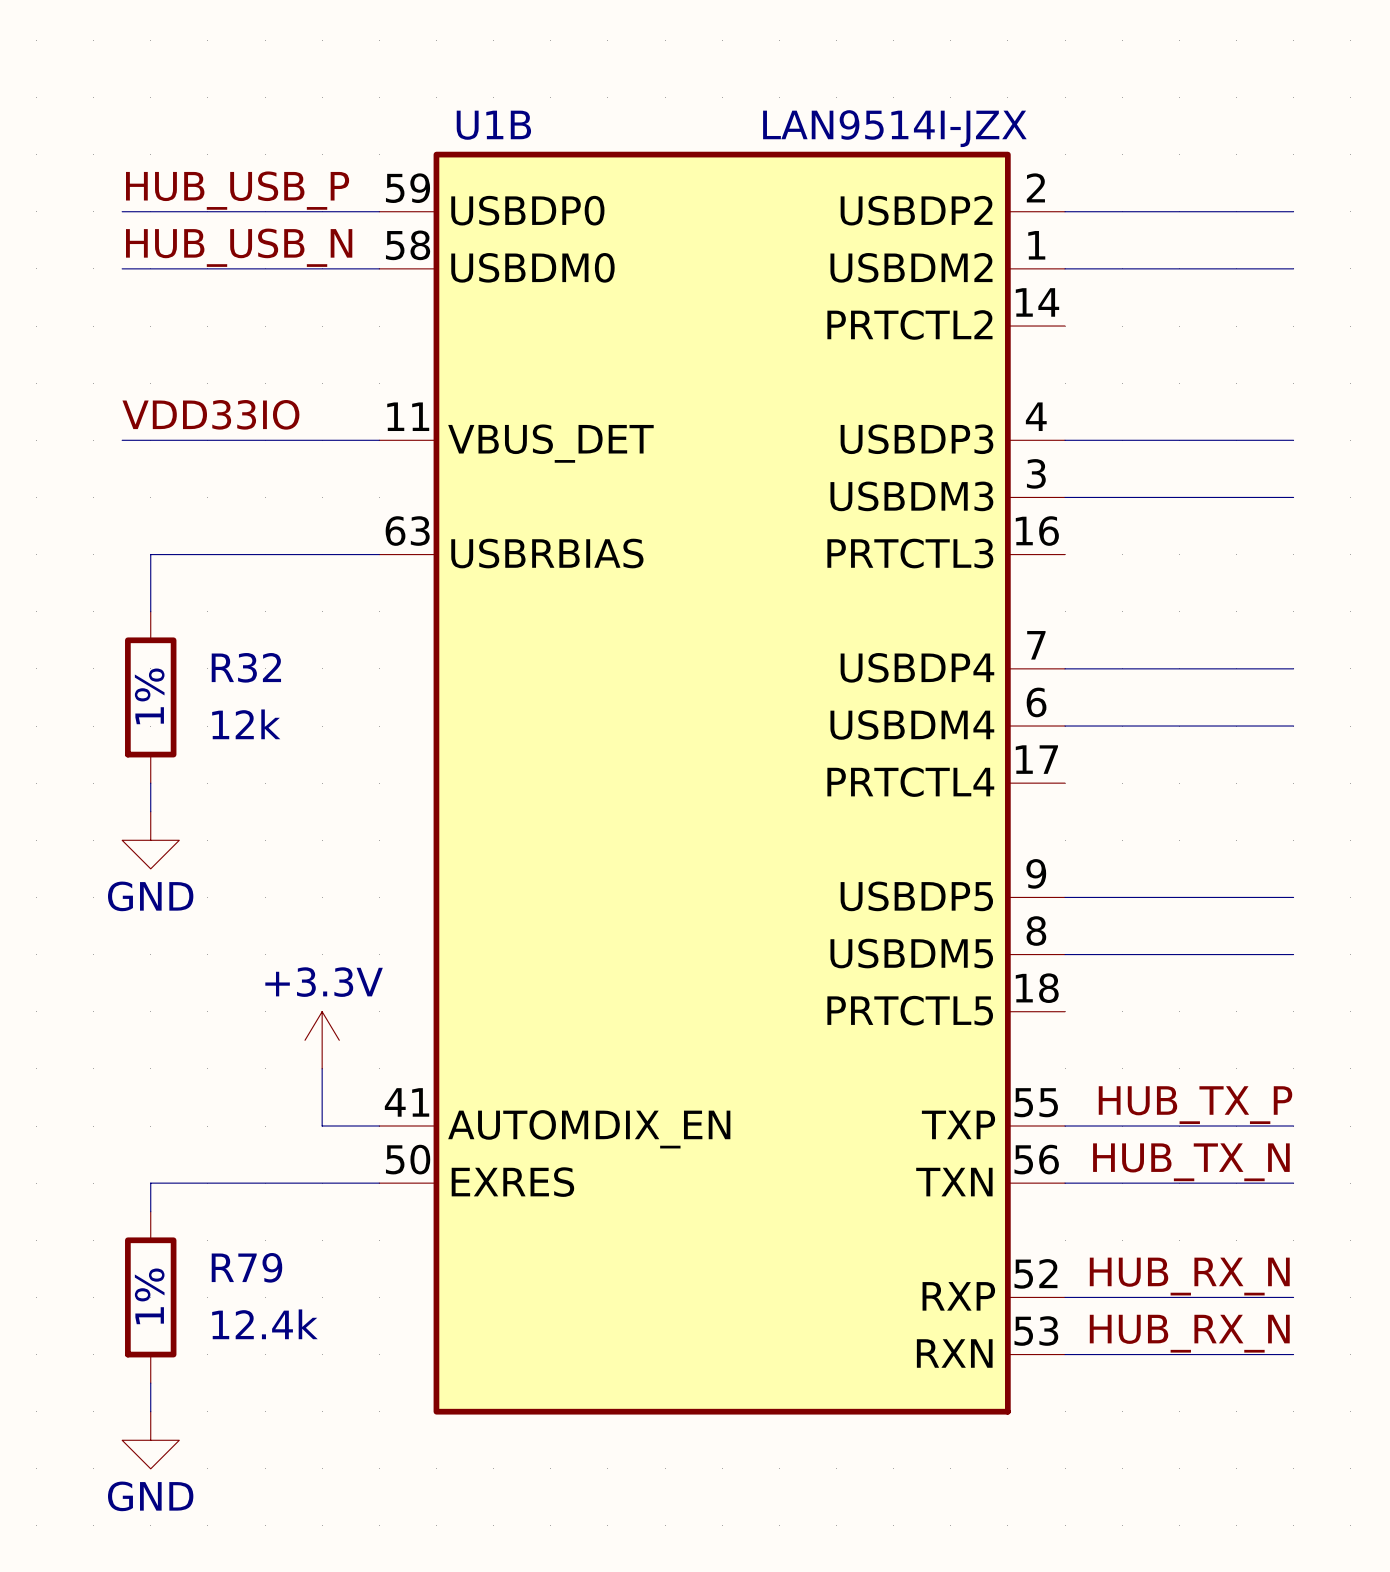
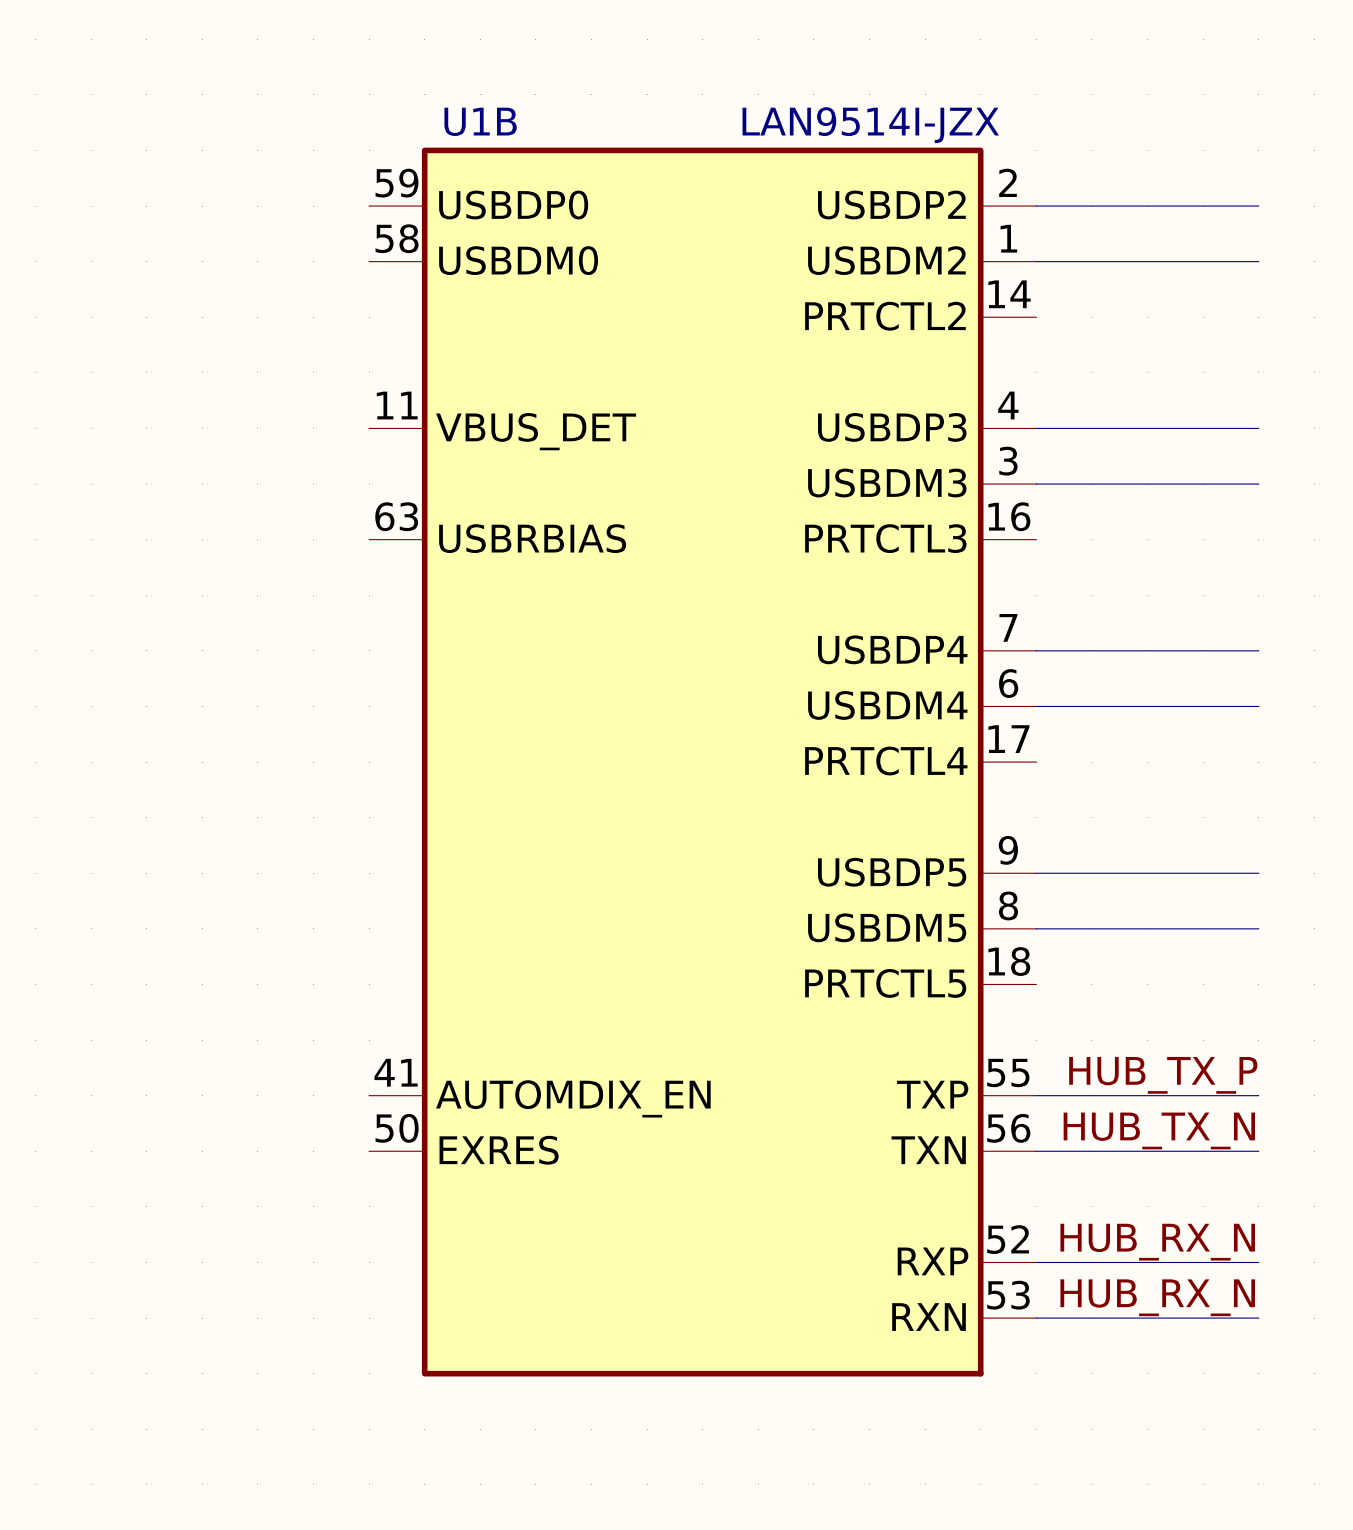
label: HUB_USB_P (237, 190) -> none
wire: (122, 211) (379, 211) -> none
label: HUB_USB_N (239, 247) -> none
wire: (122, 268) (379, 268) -> none
label: VDD33IO (210, 414) -> none
wire: (122, 440) (379, 440) -> none
wire: (379, 554) (150, 554) (150, 611) -> none
R32: 12k (150, 697) -> none
wire: (150, 783) (150, 811) -> none
power symbol: GND (150, 840) -> none
power symbol: +3.3V (322, 1040) -> none
wire: (322, 1068) (322, 1126) (379, 1126) -> none
wire: (379, 1183) (150, 1183) (150, 1211) -> none
R79: 12.4k (150, 1297) -> none
wire: (150, 1383) (150, 1411) -> none
power symbol: GND (150, 1440) -> none

